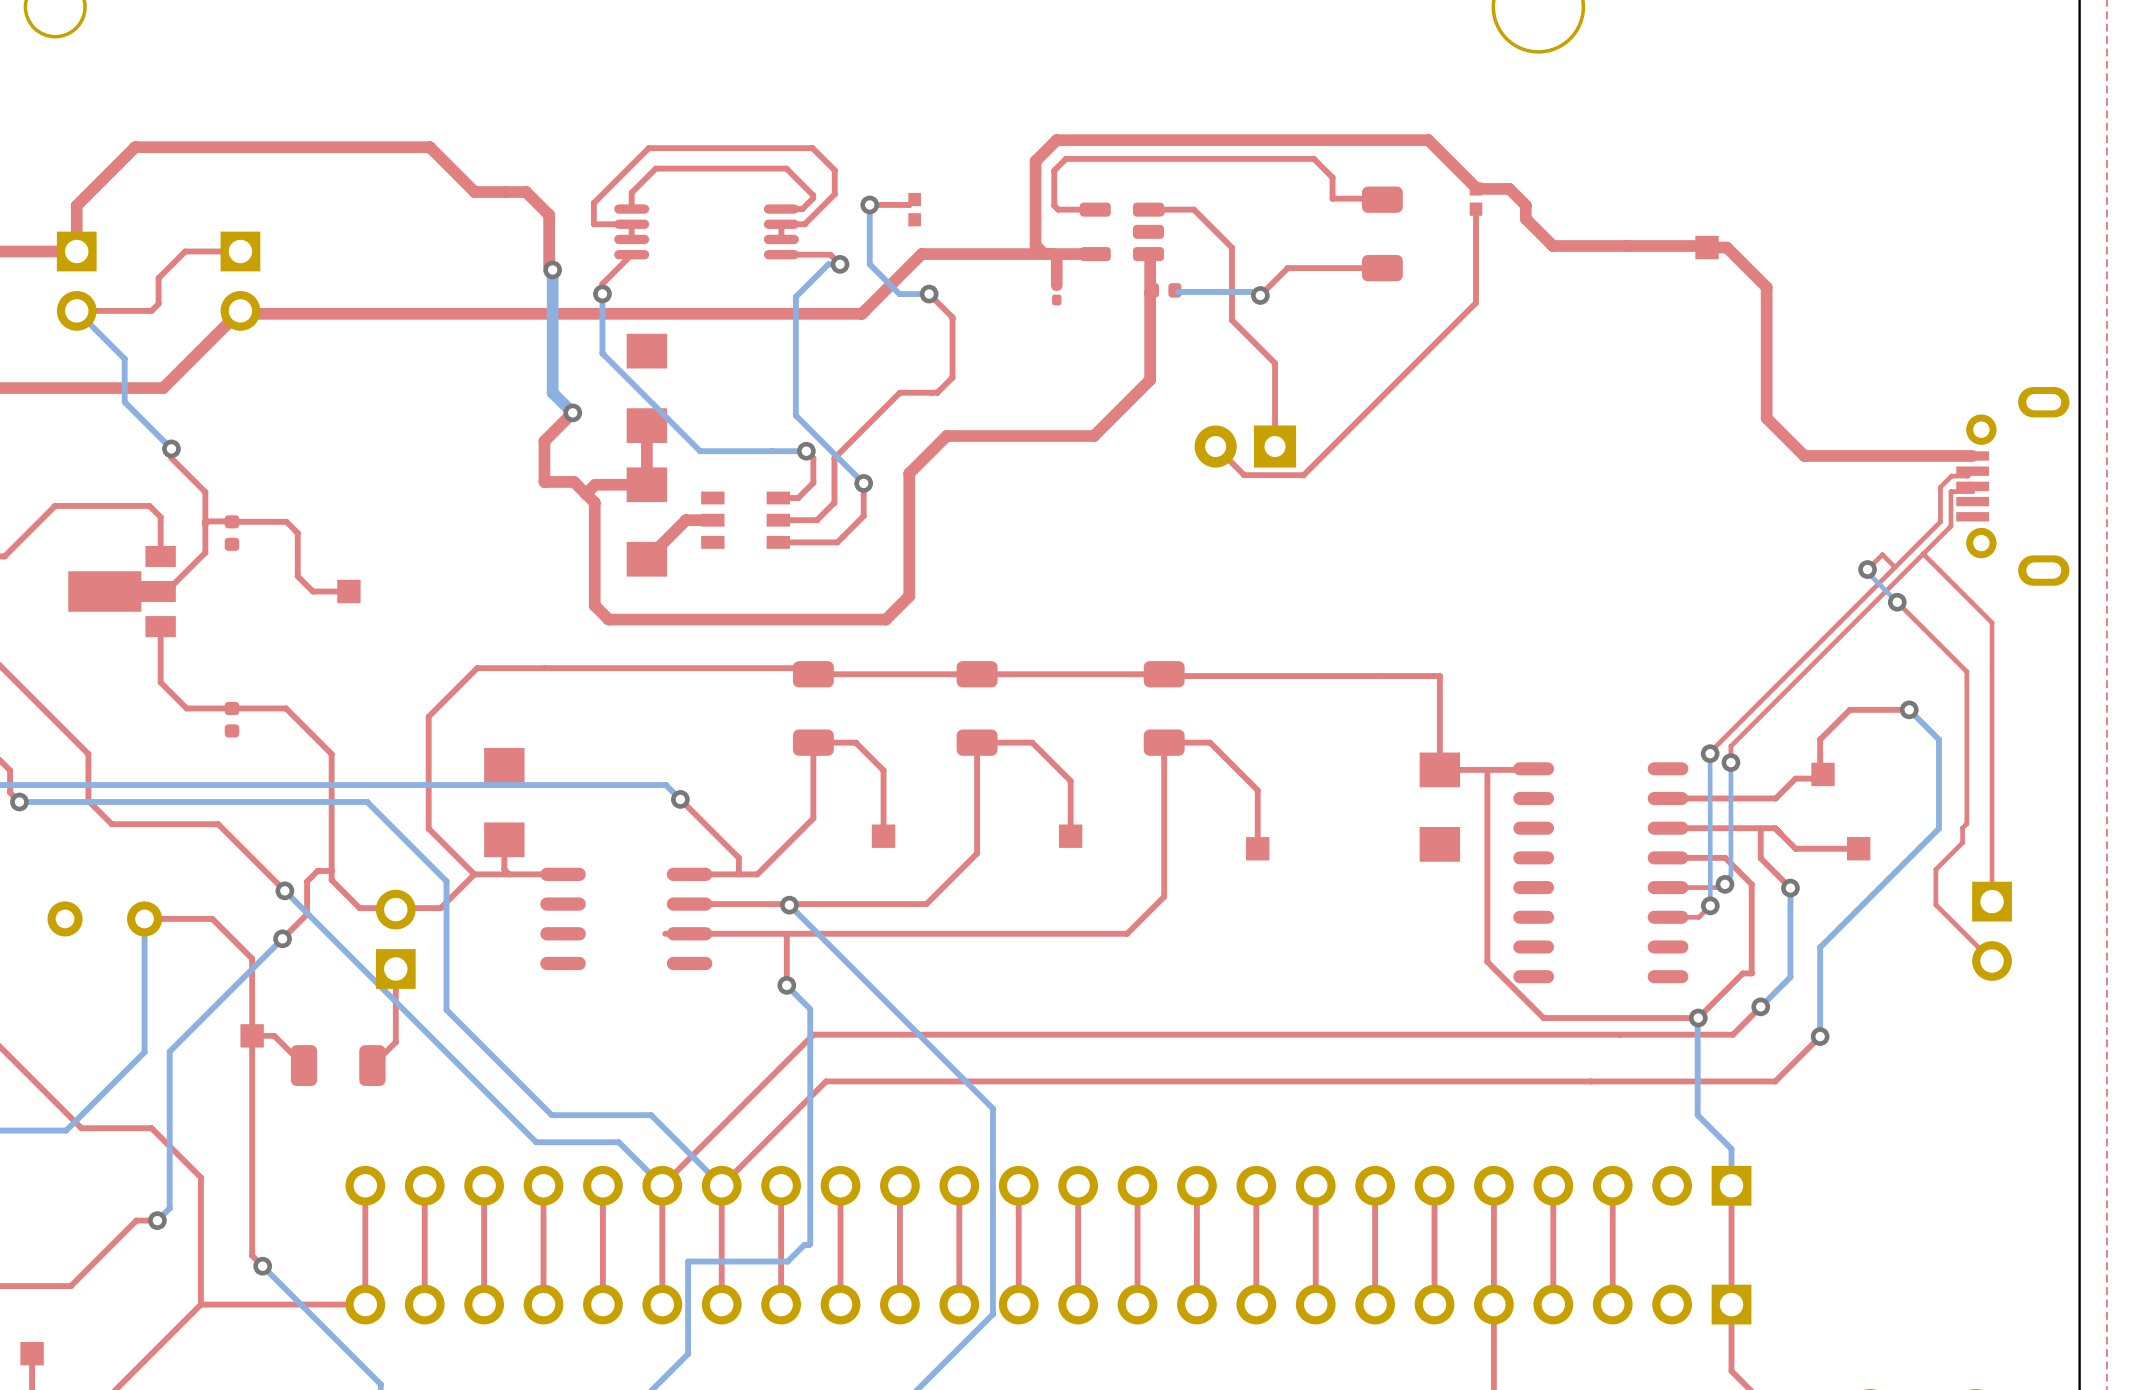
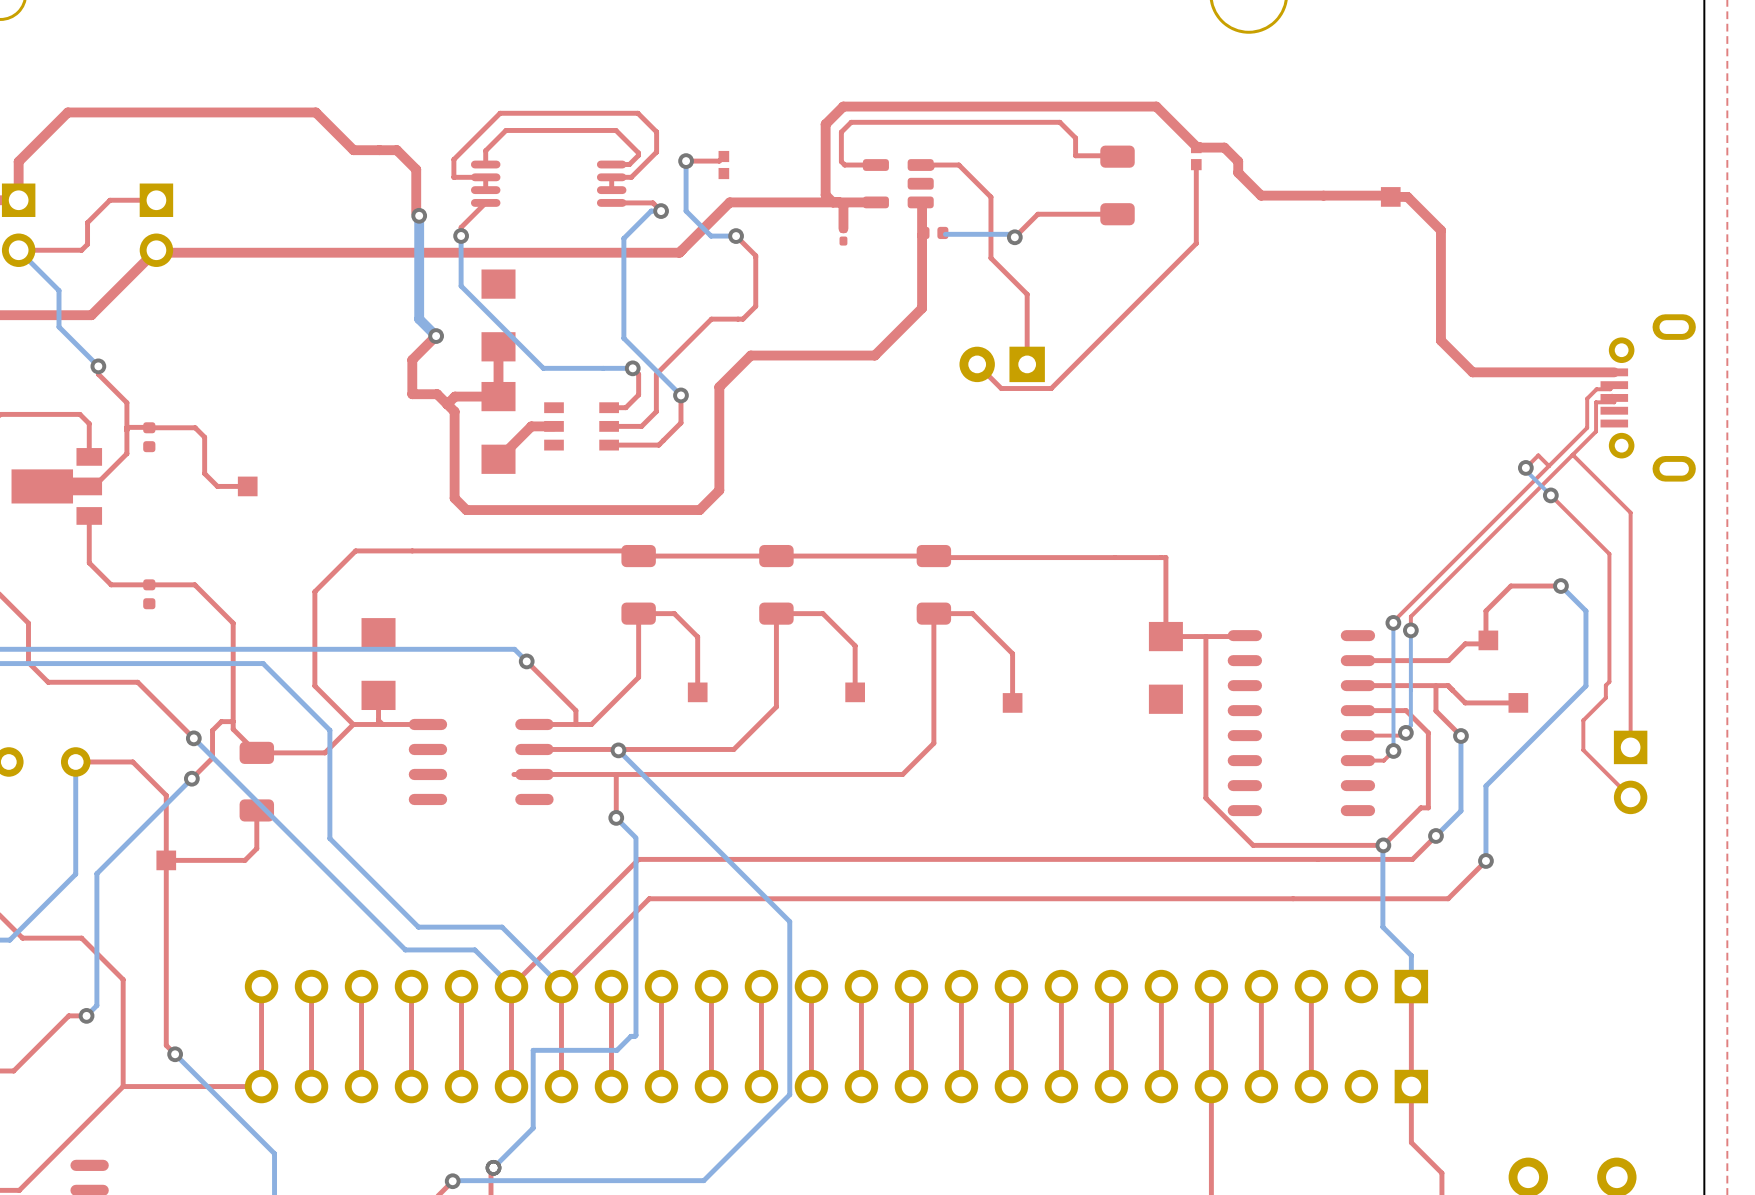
part: (395, 939) -> none
top track: (395, 968) (395, 1042) (372, 1065) -> none
top track: (274, 1035) (304, 1065) -> (184, 860) (245, 860) (256, 848) (256, 810)
part rotation: 0° (338, 1065) -> 90° clockwise (256, 781)
part position: (338, 1065) -> (256, 781)

